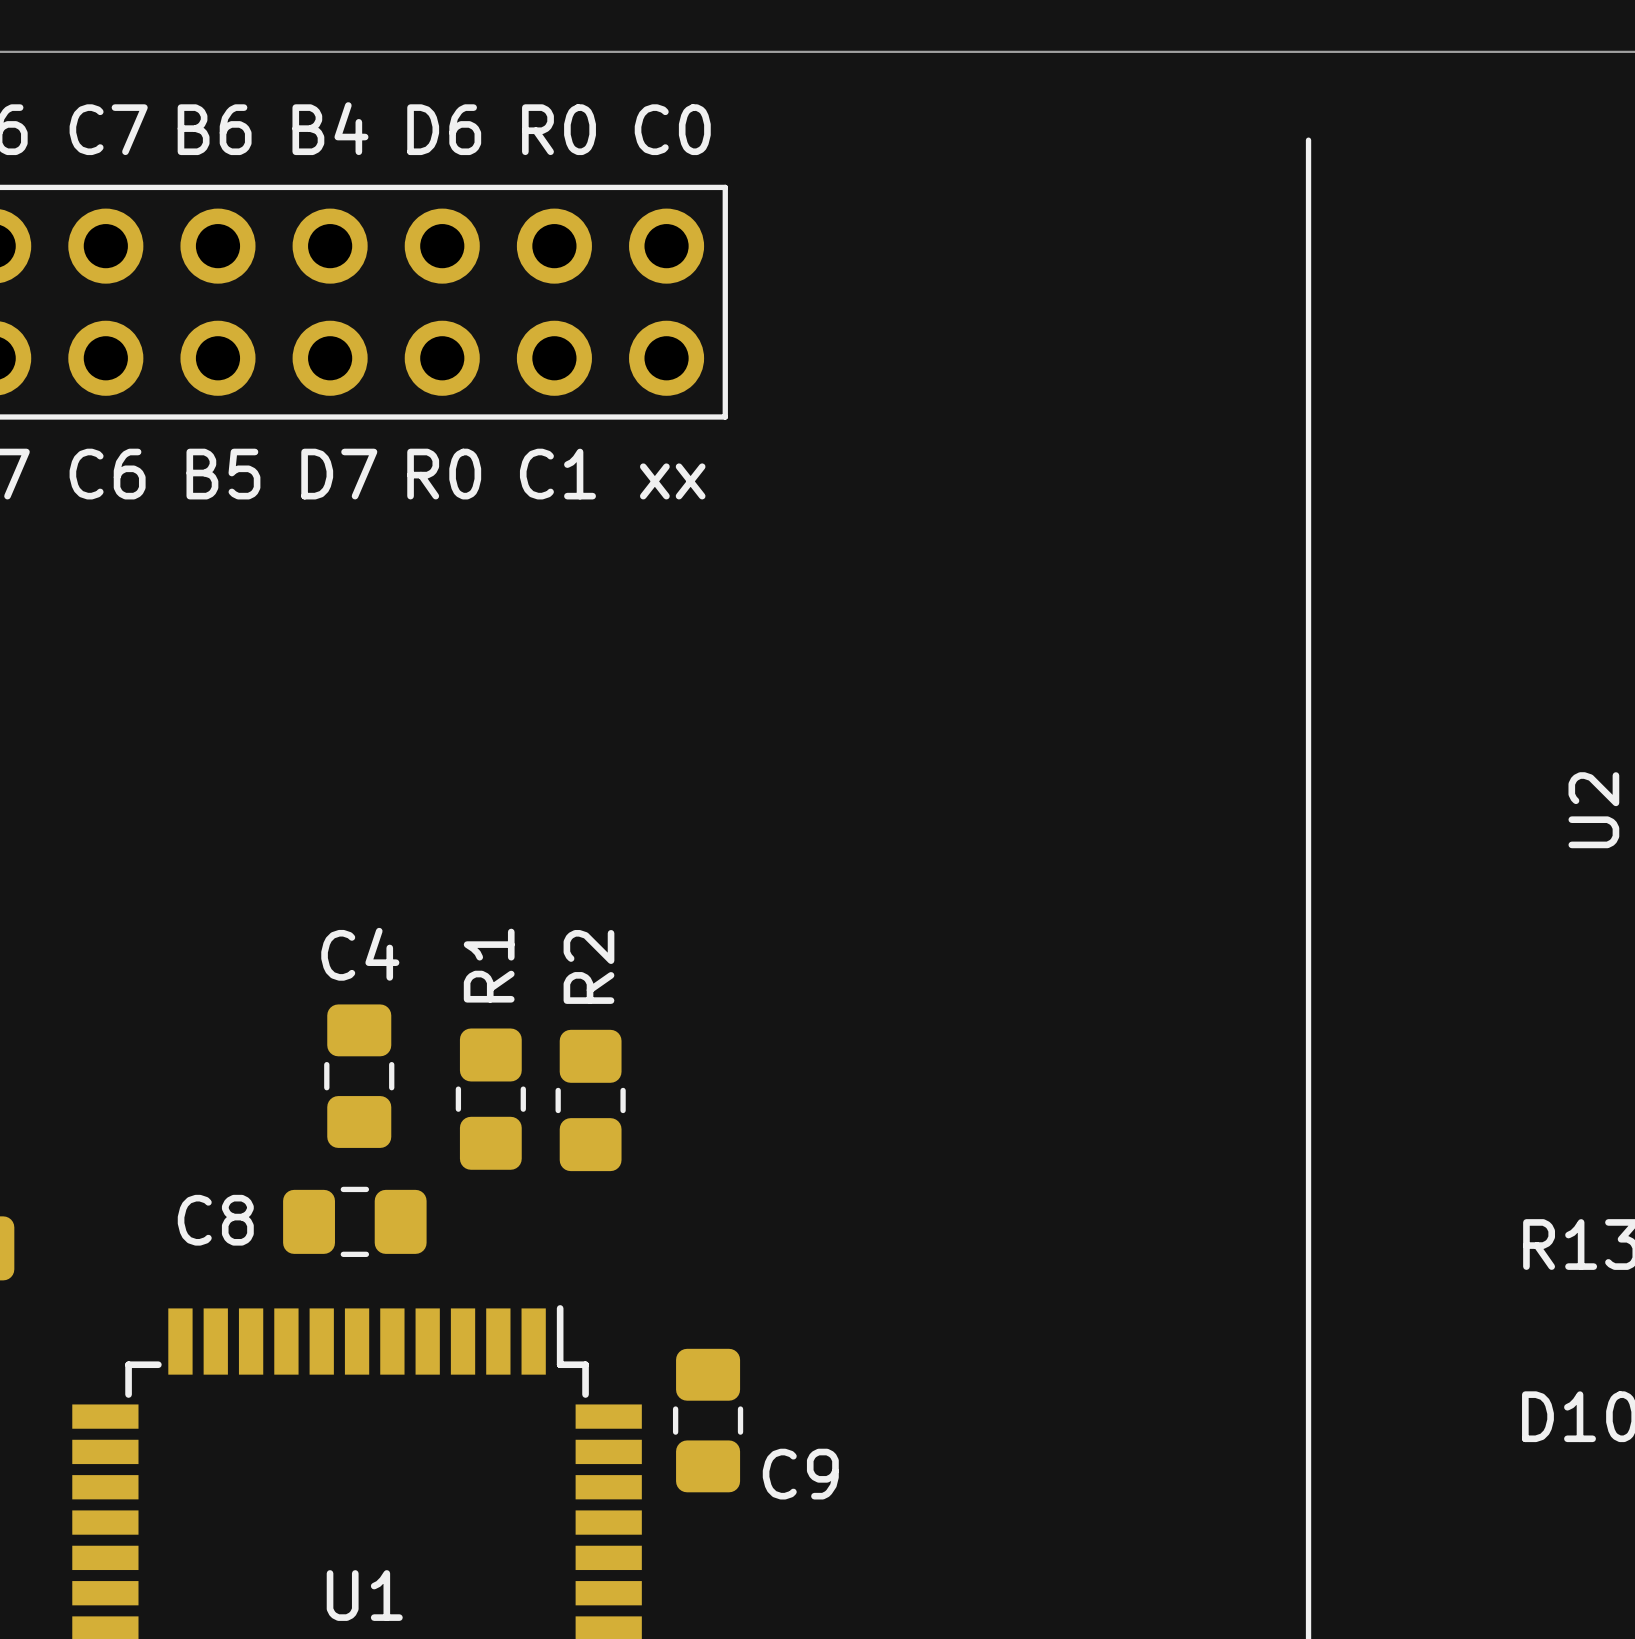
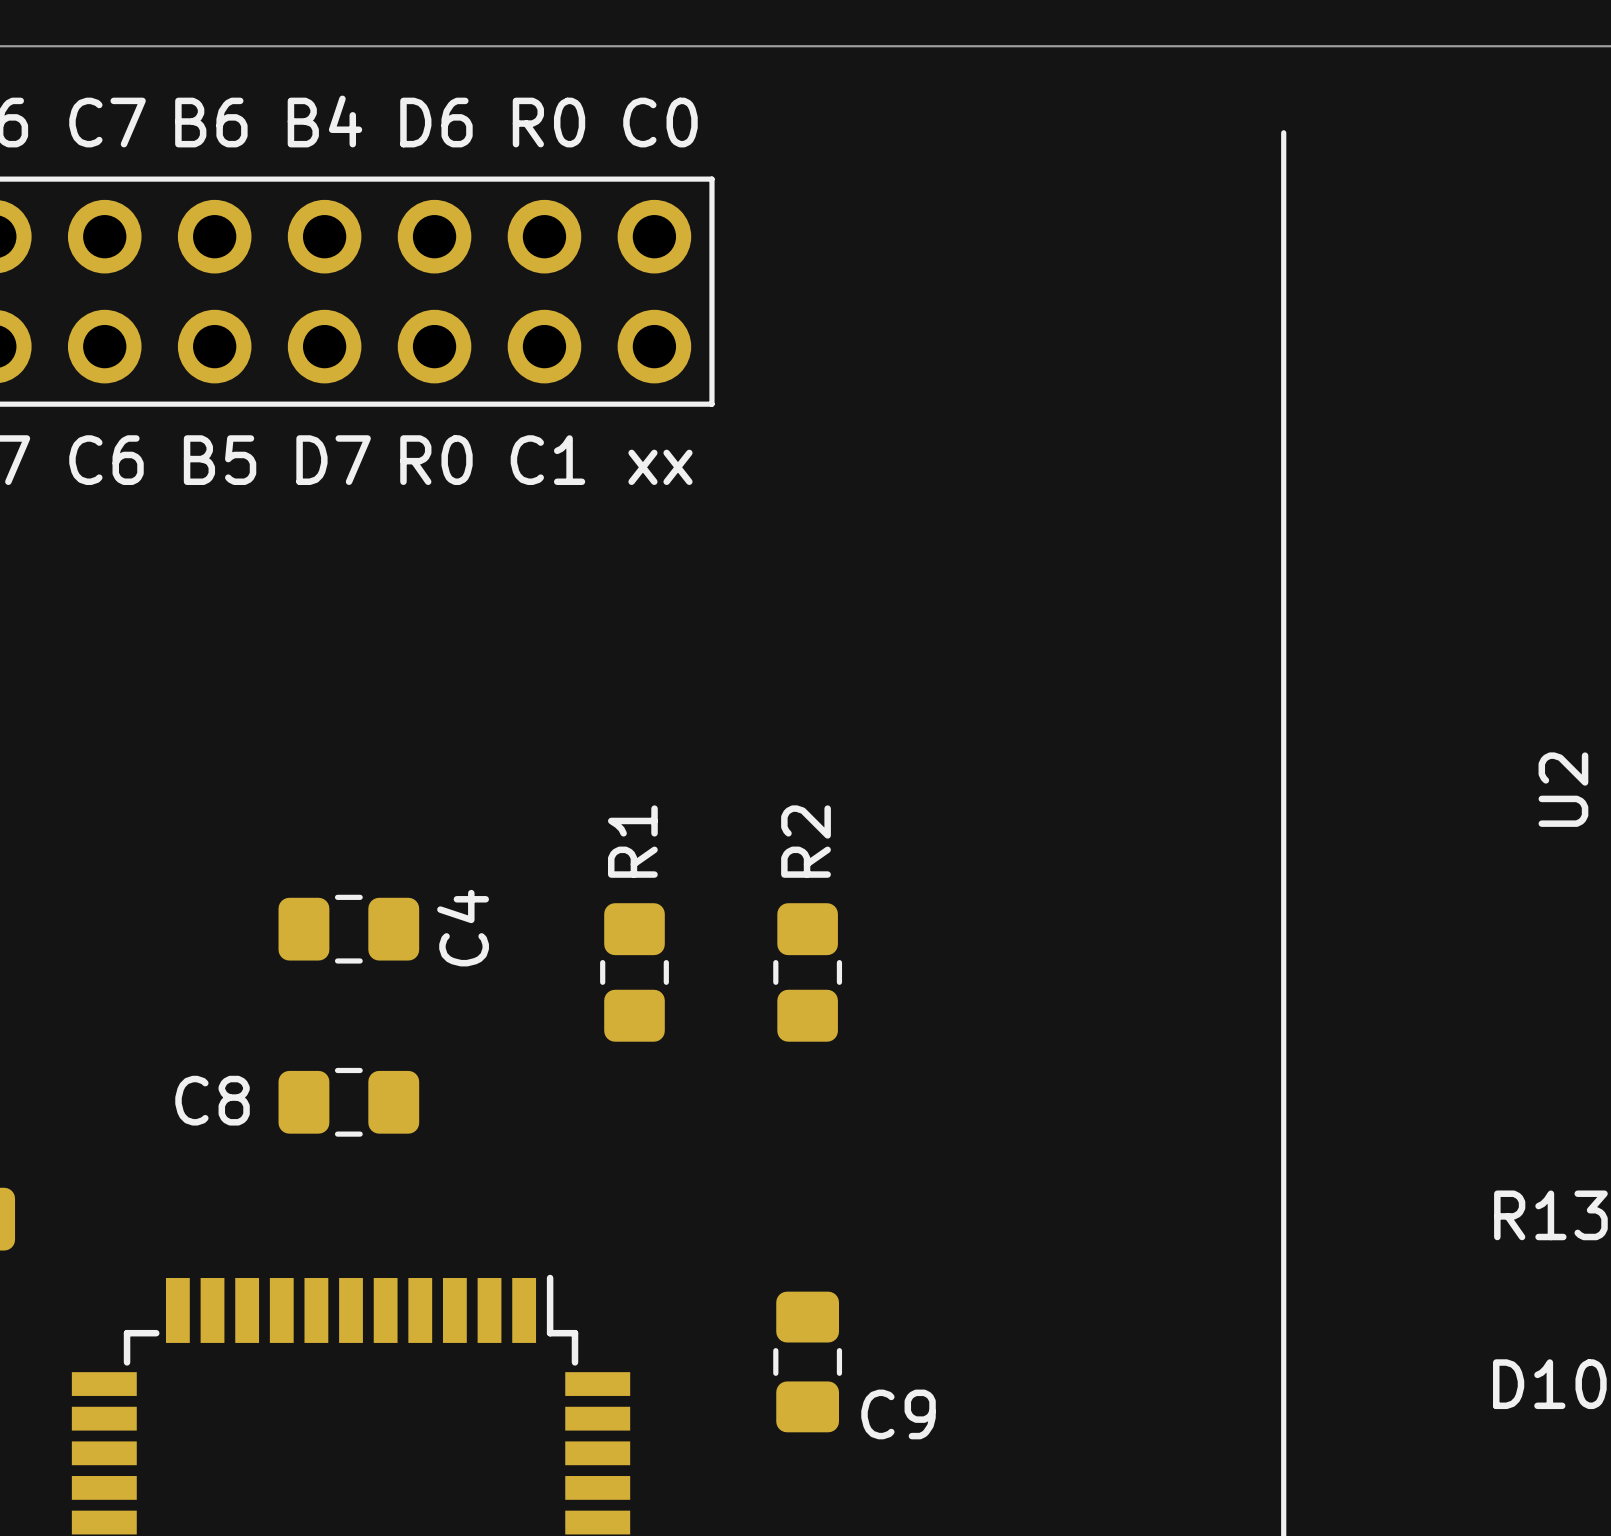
C4 rotation: 0° (359, 1076) -> 90° clockwise (348, 929)
C4 position: (359, 1076) -> (348, 929)
R1 position: (490, 1099) -> (634, 972)
R2 position: (590, 1100) -> (807, 972)
C8 position: (354, 1221) -> (348, 1102)
C9 position: (708, 1420) -> (807, 1361)

